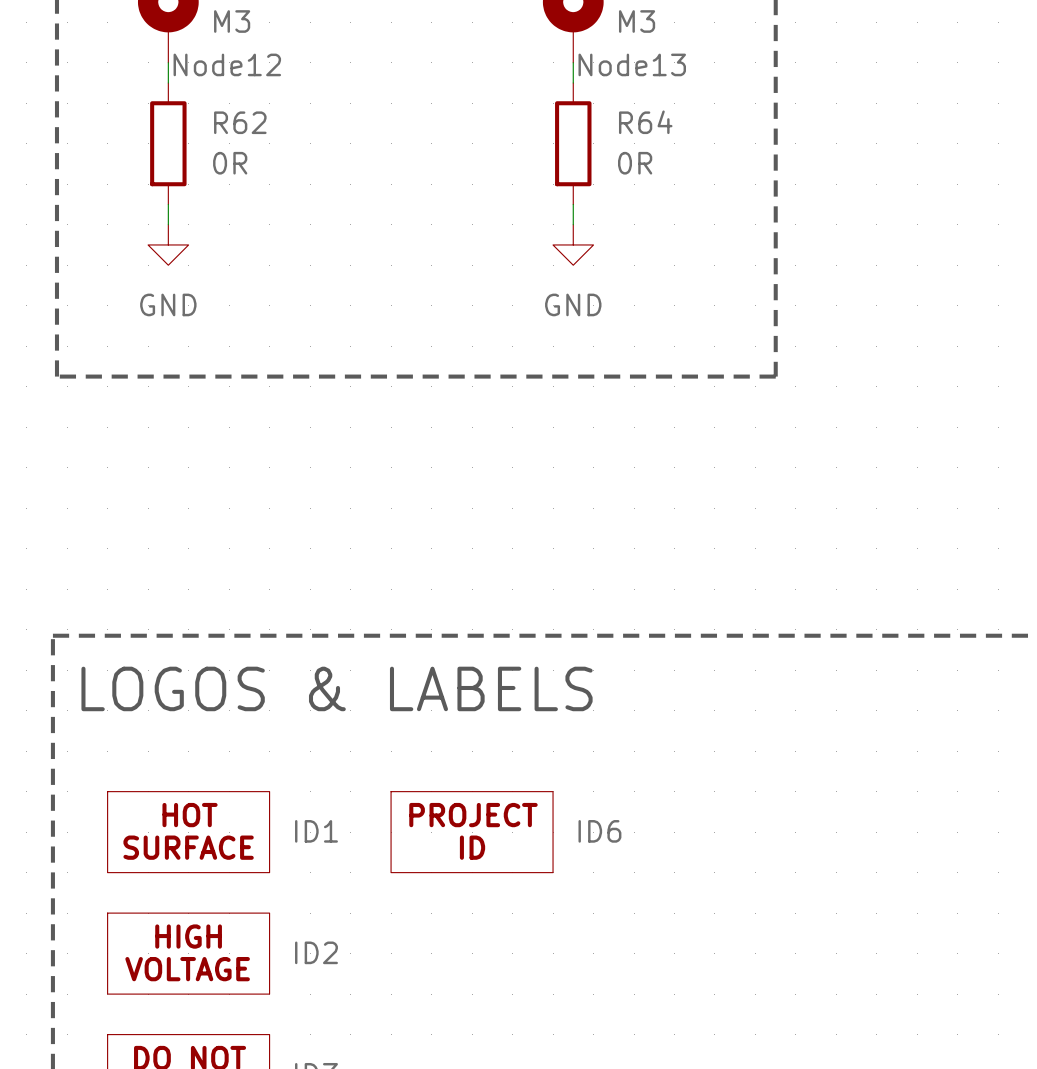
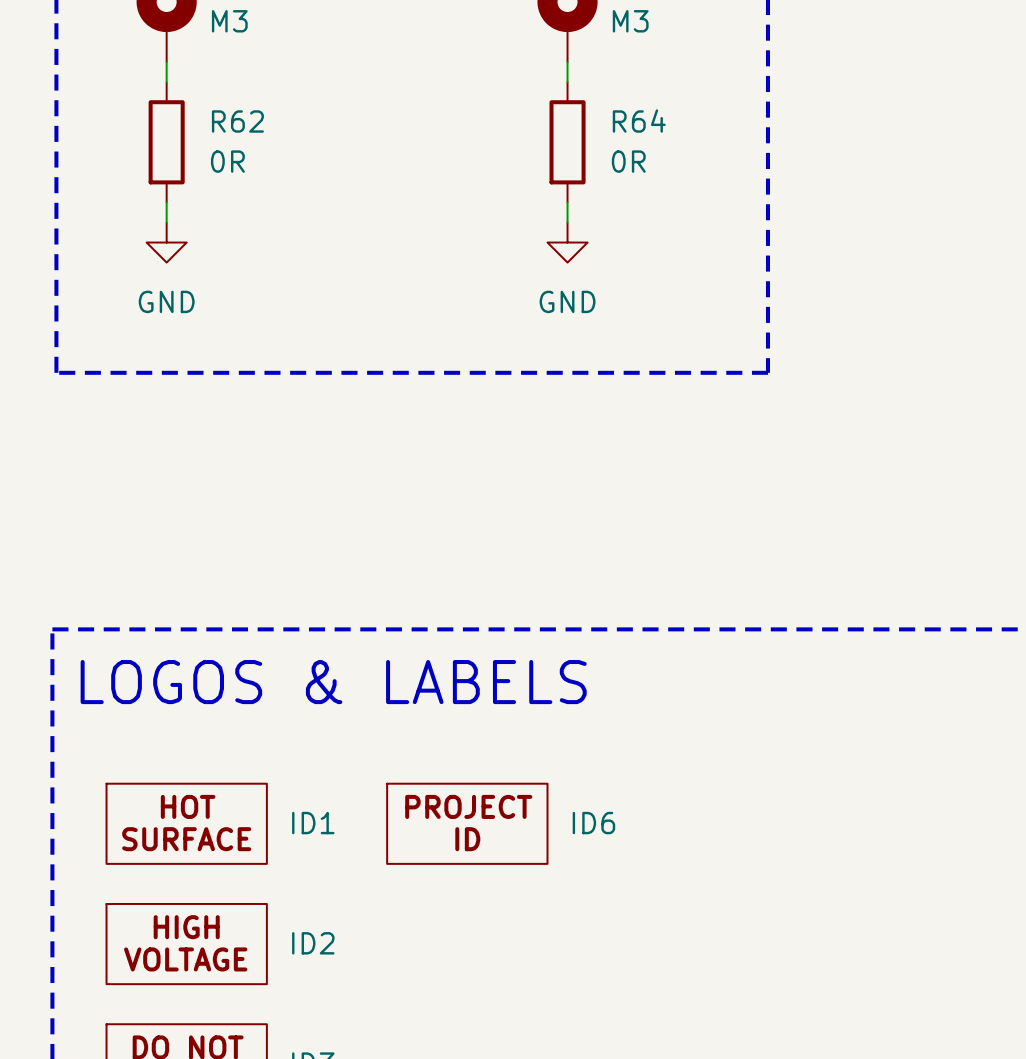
label: Node12 (227, 64) -> none
label: Node13 (632, 64) -> none

